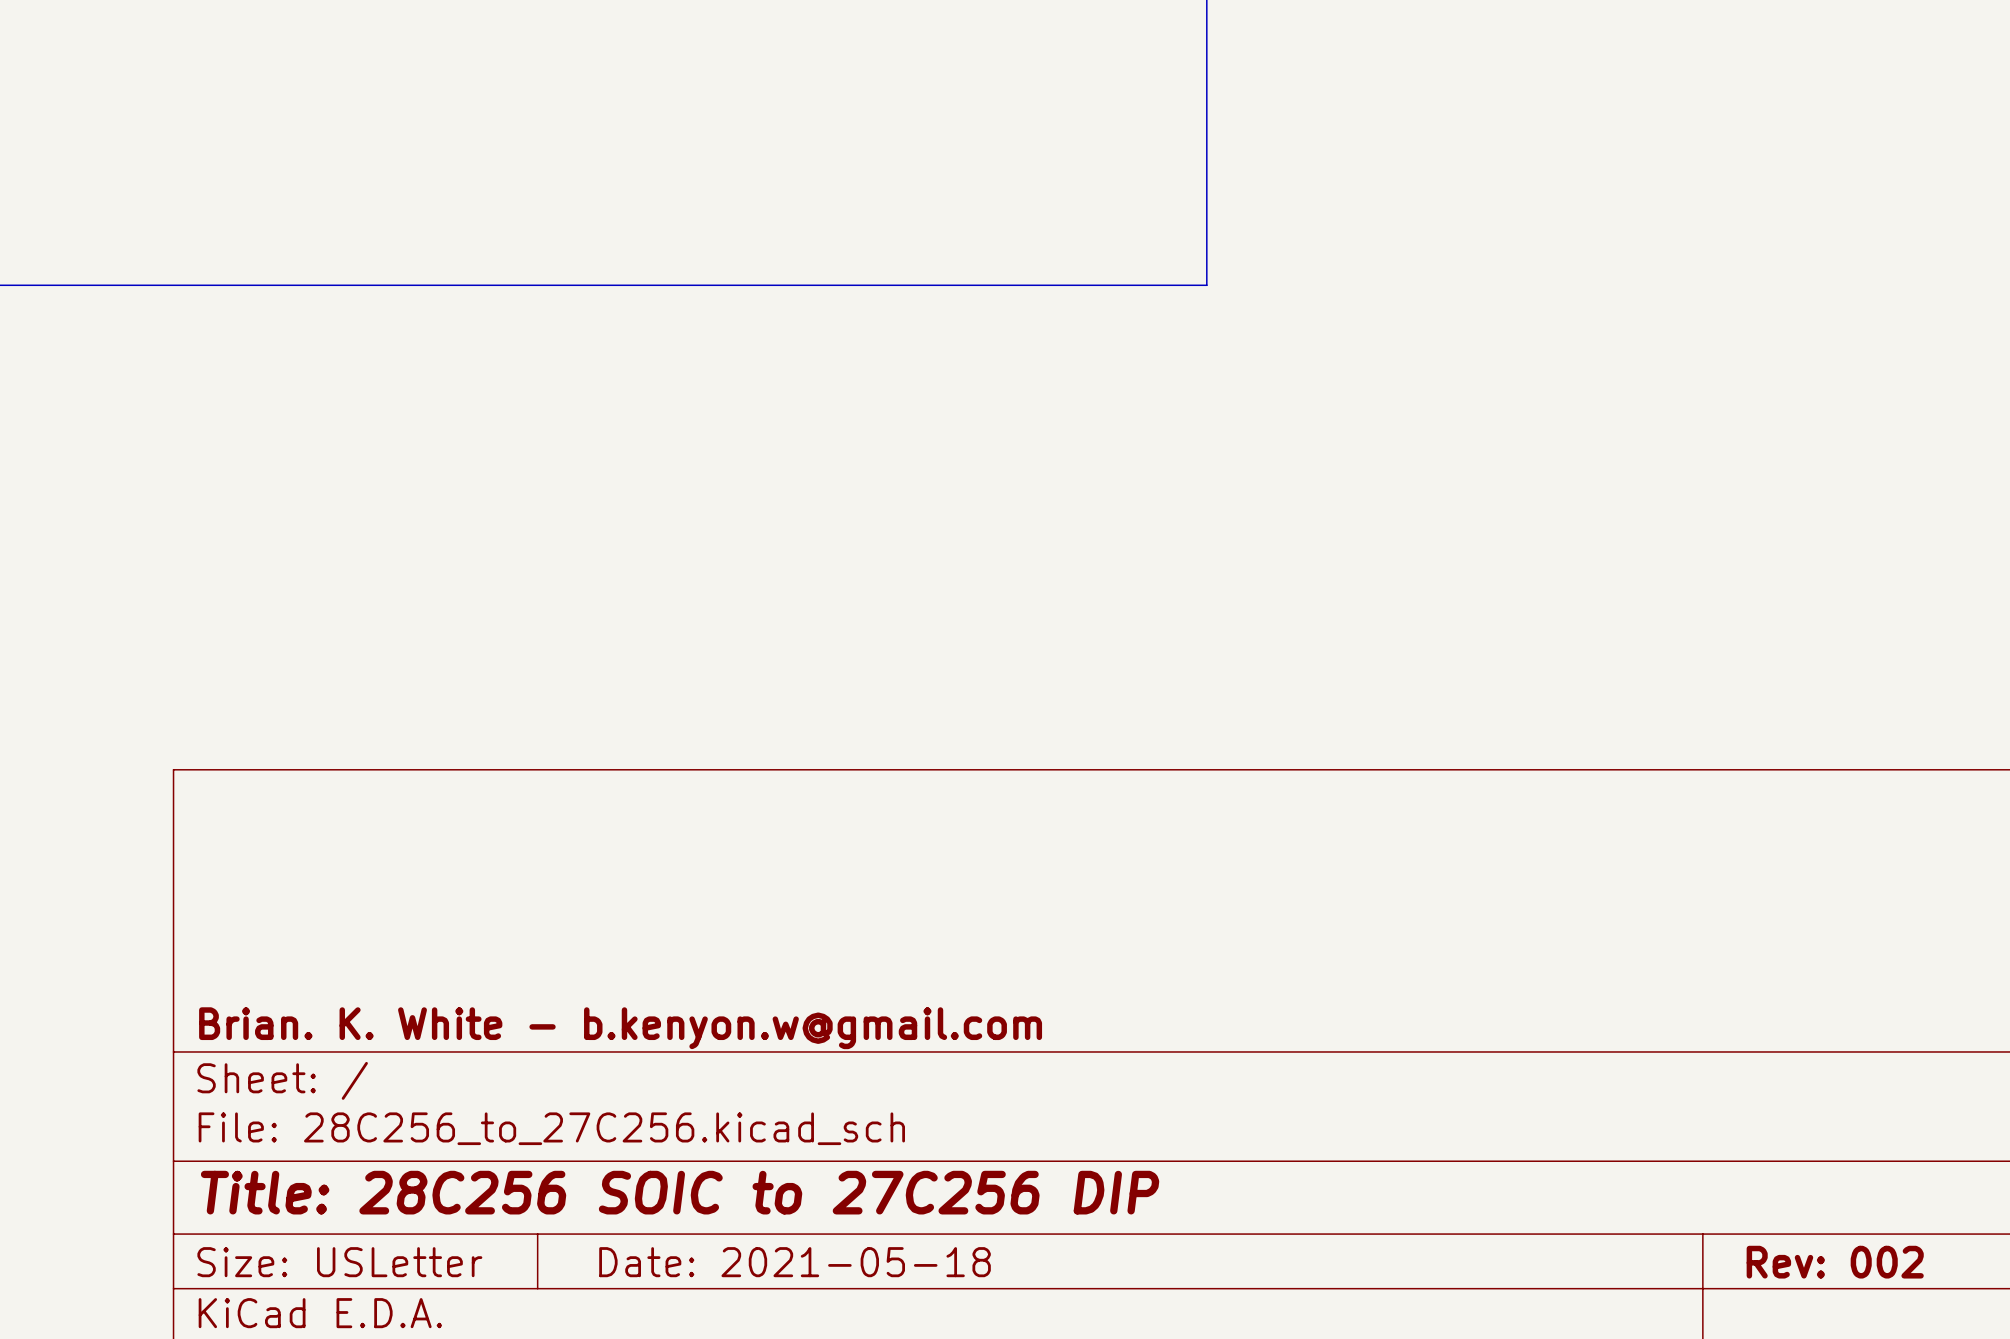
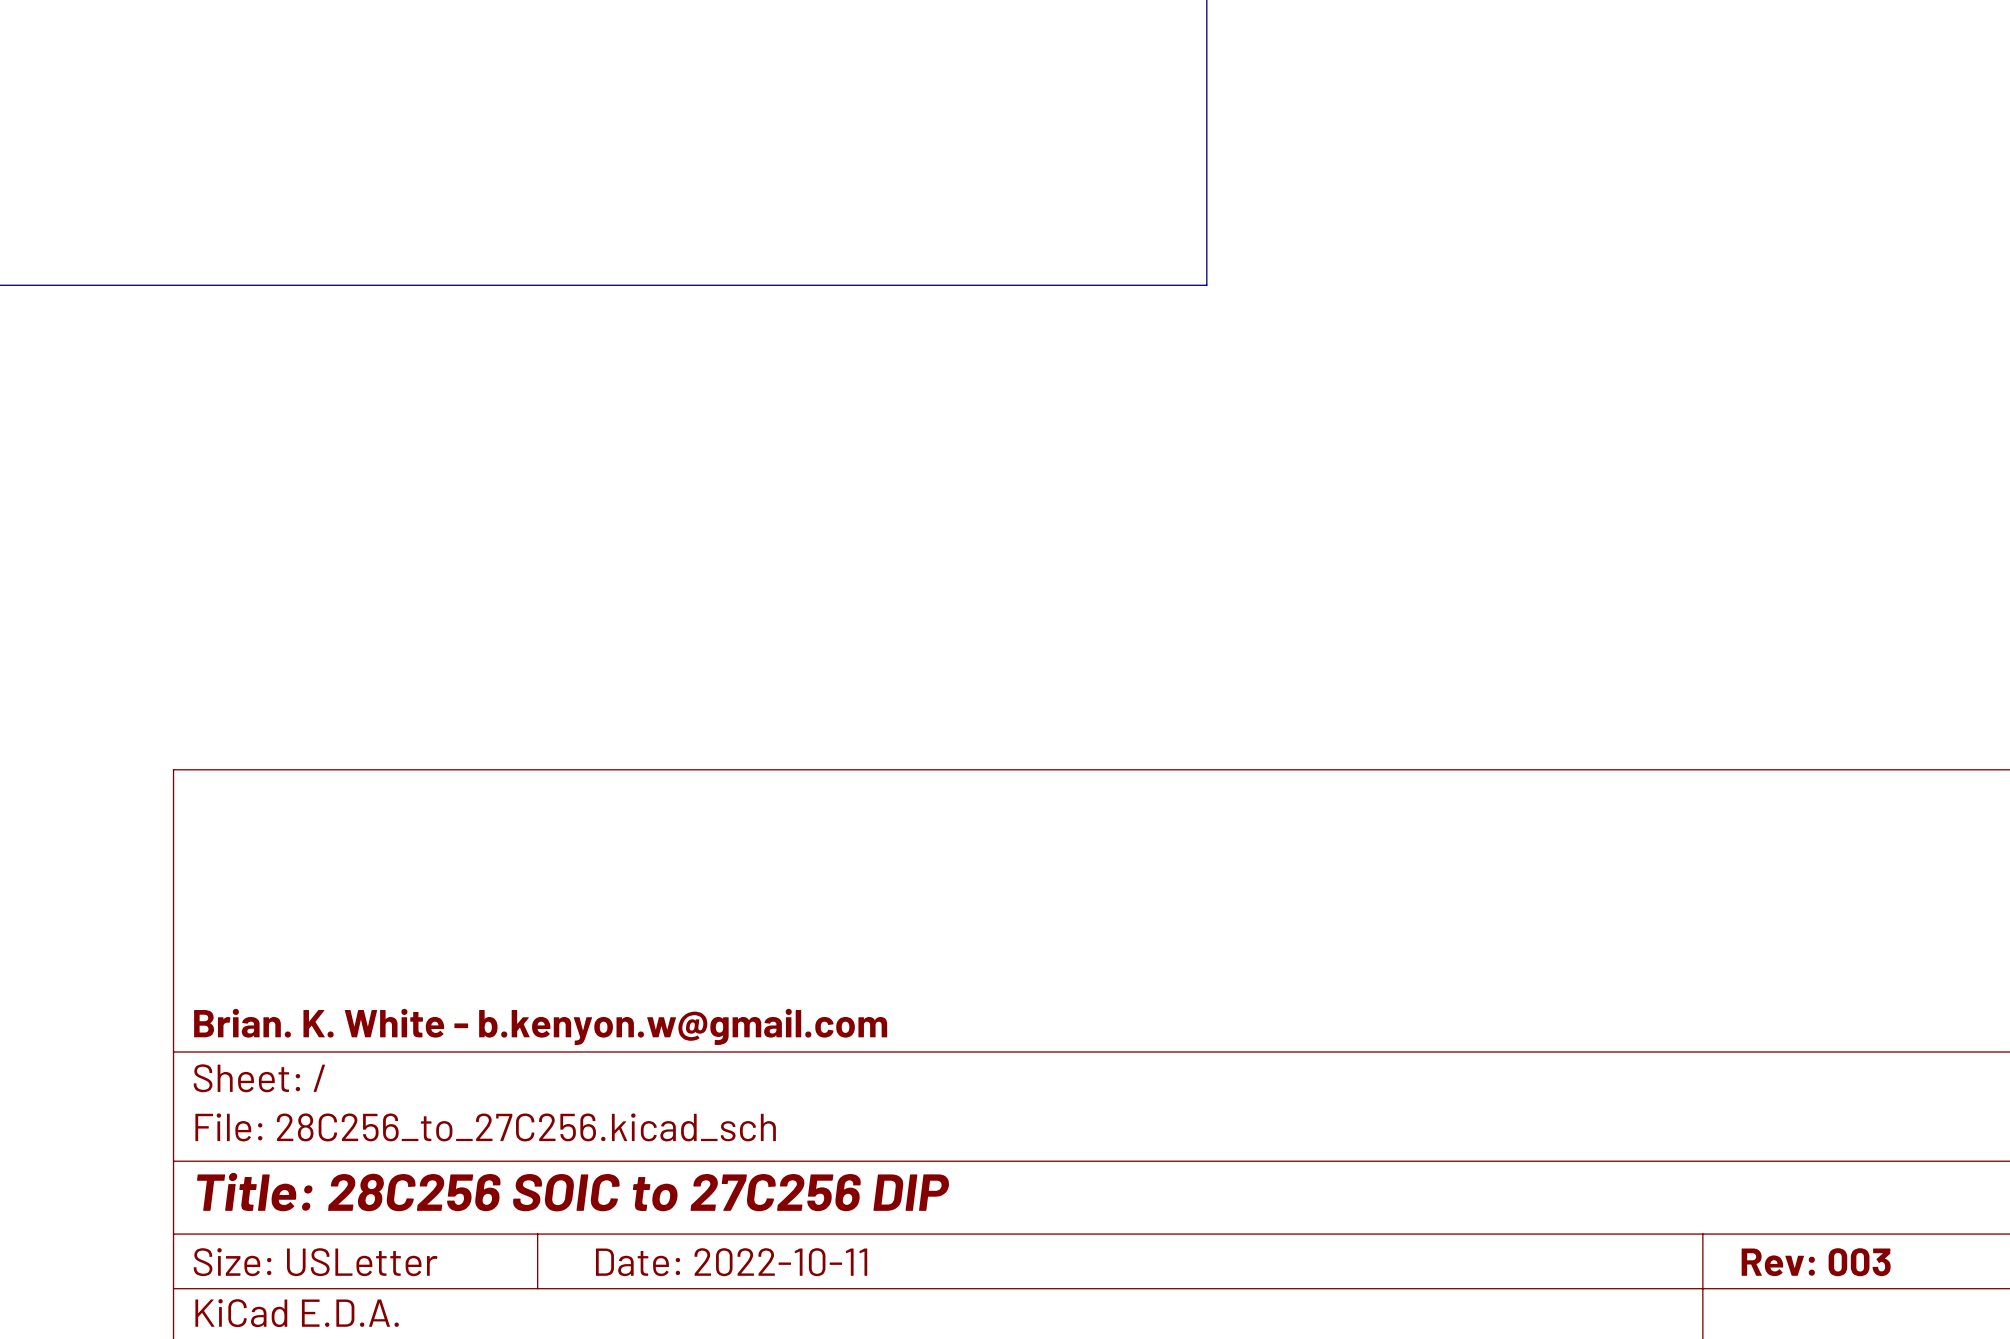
title block: Date: 2021-05-18 (795, 1262) -> Date: 2022-10-11 (731, 1262)
title block: Rev: 002 (1835, 1262) -> Rev: 003 (1816, 1262)

